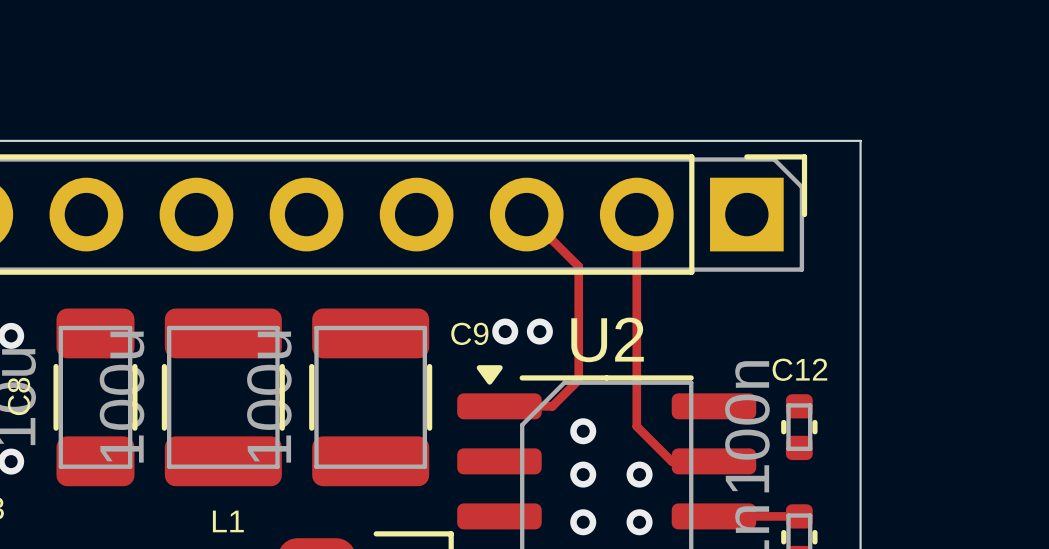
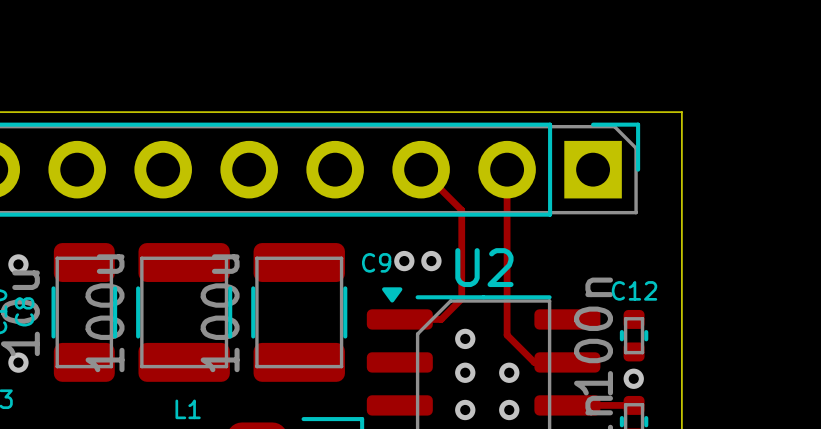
via: none -> (633, 378)

